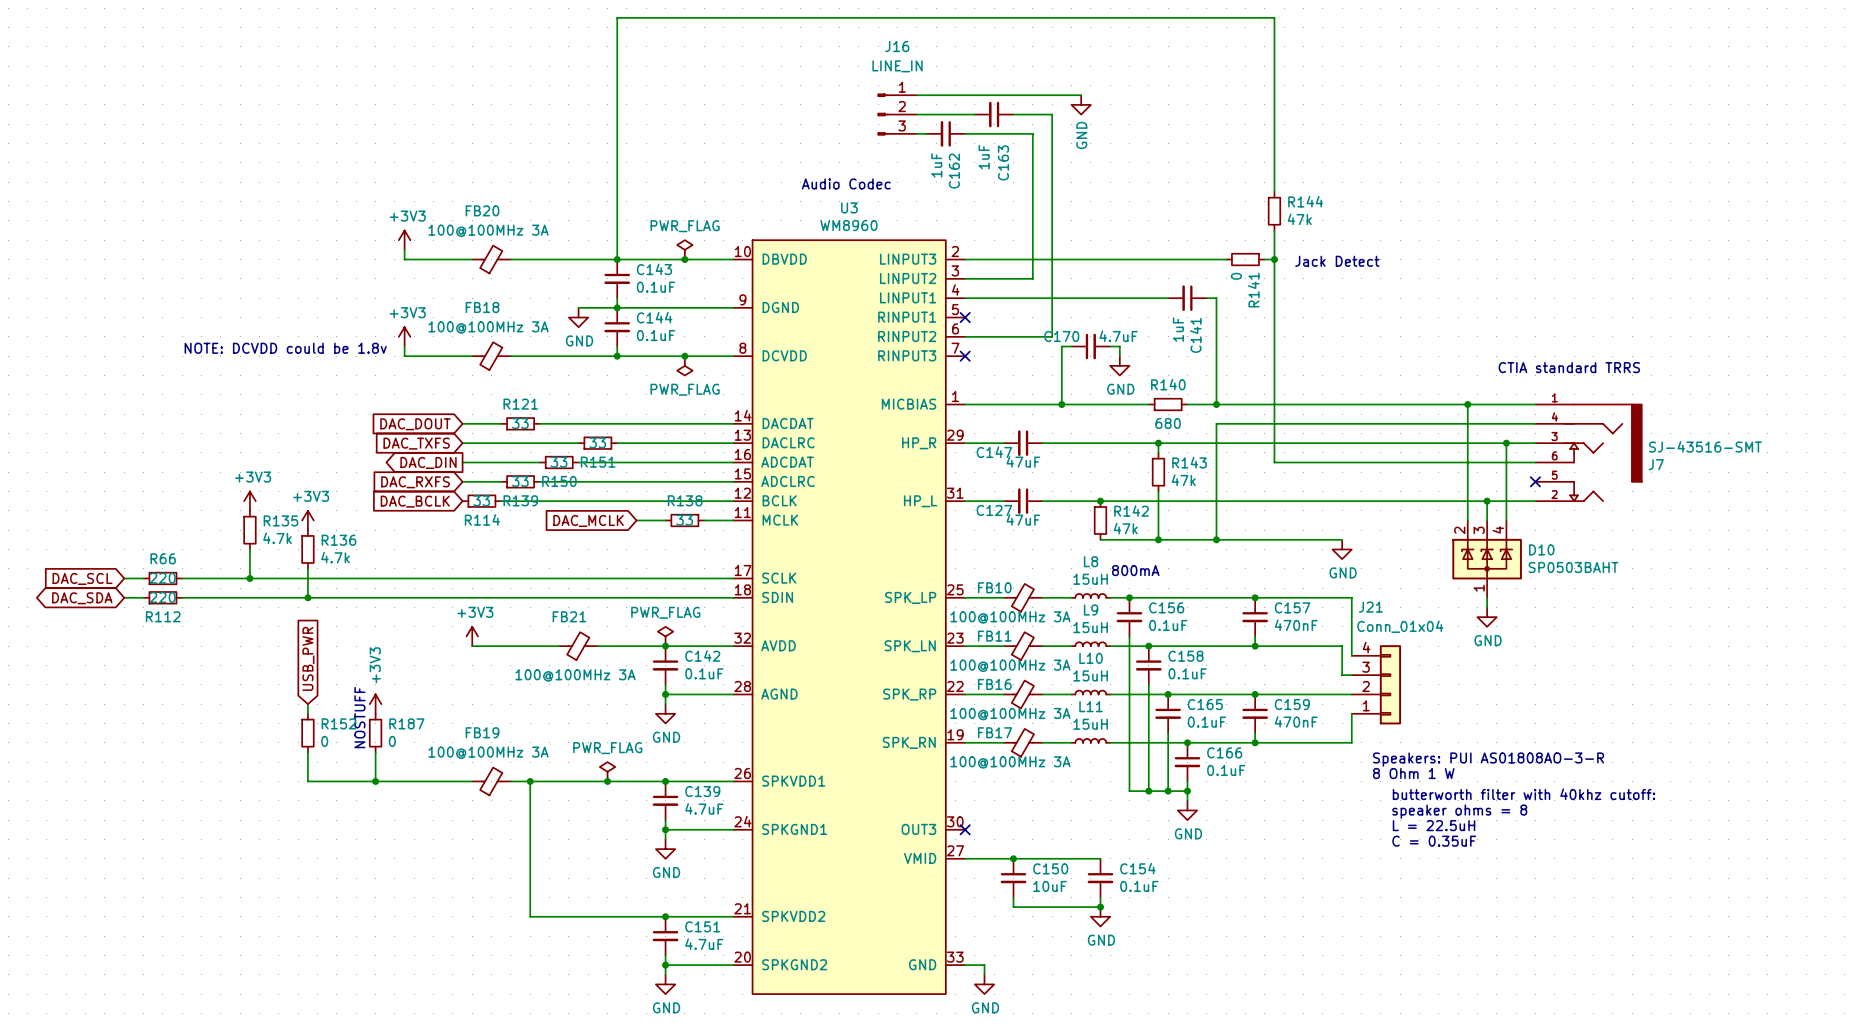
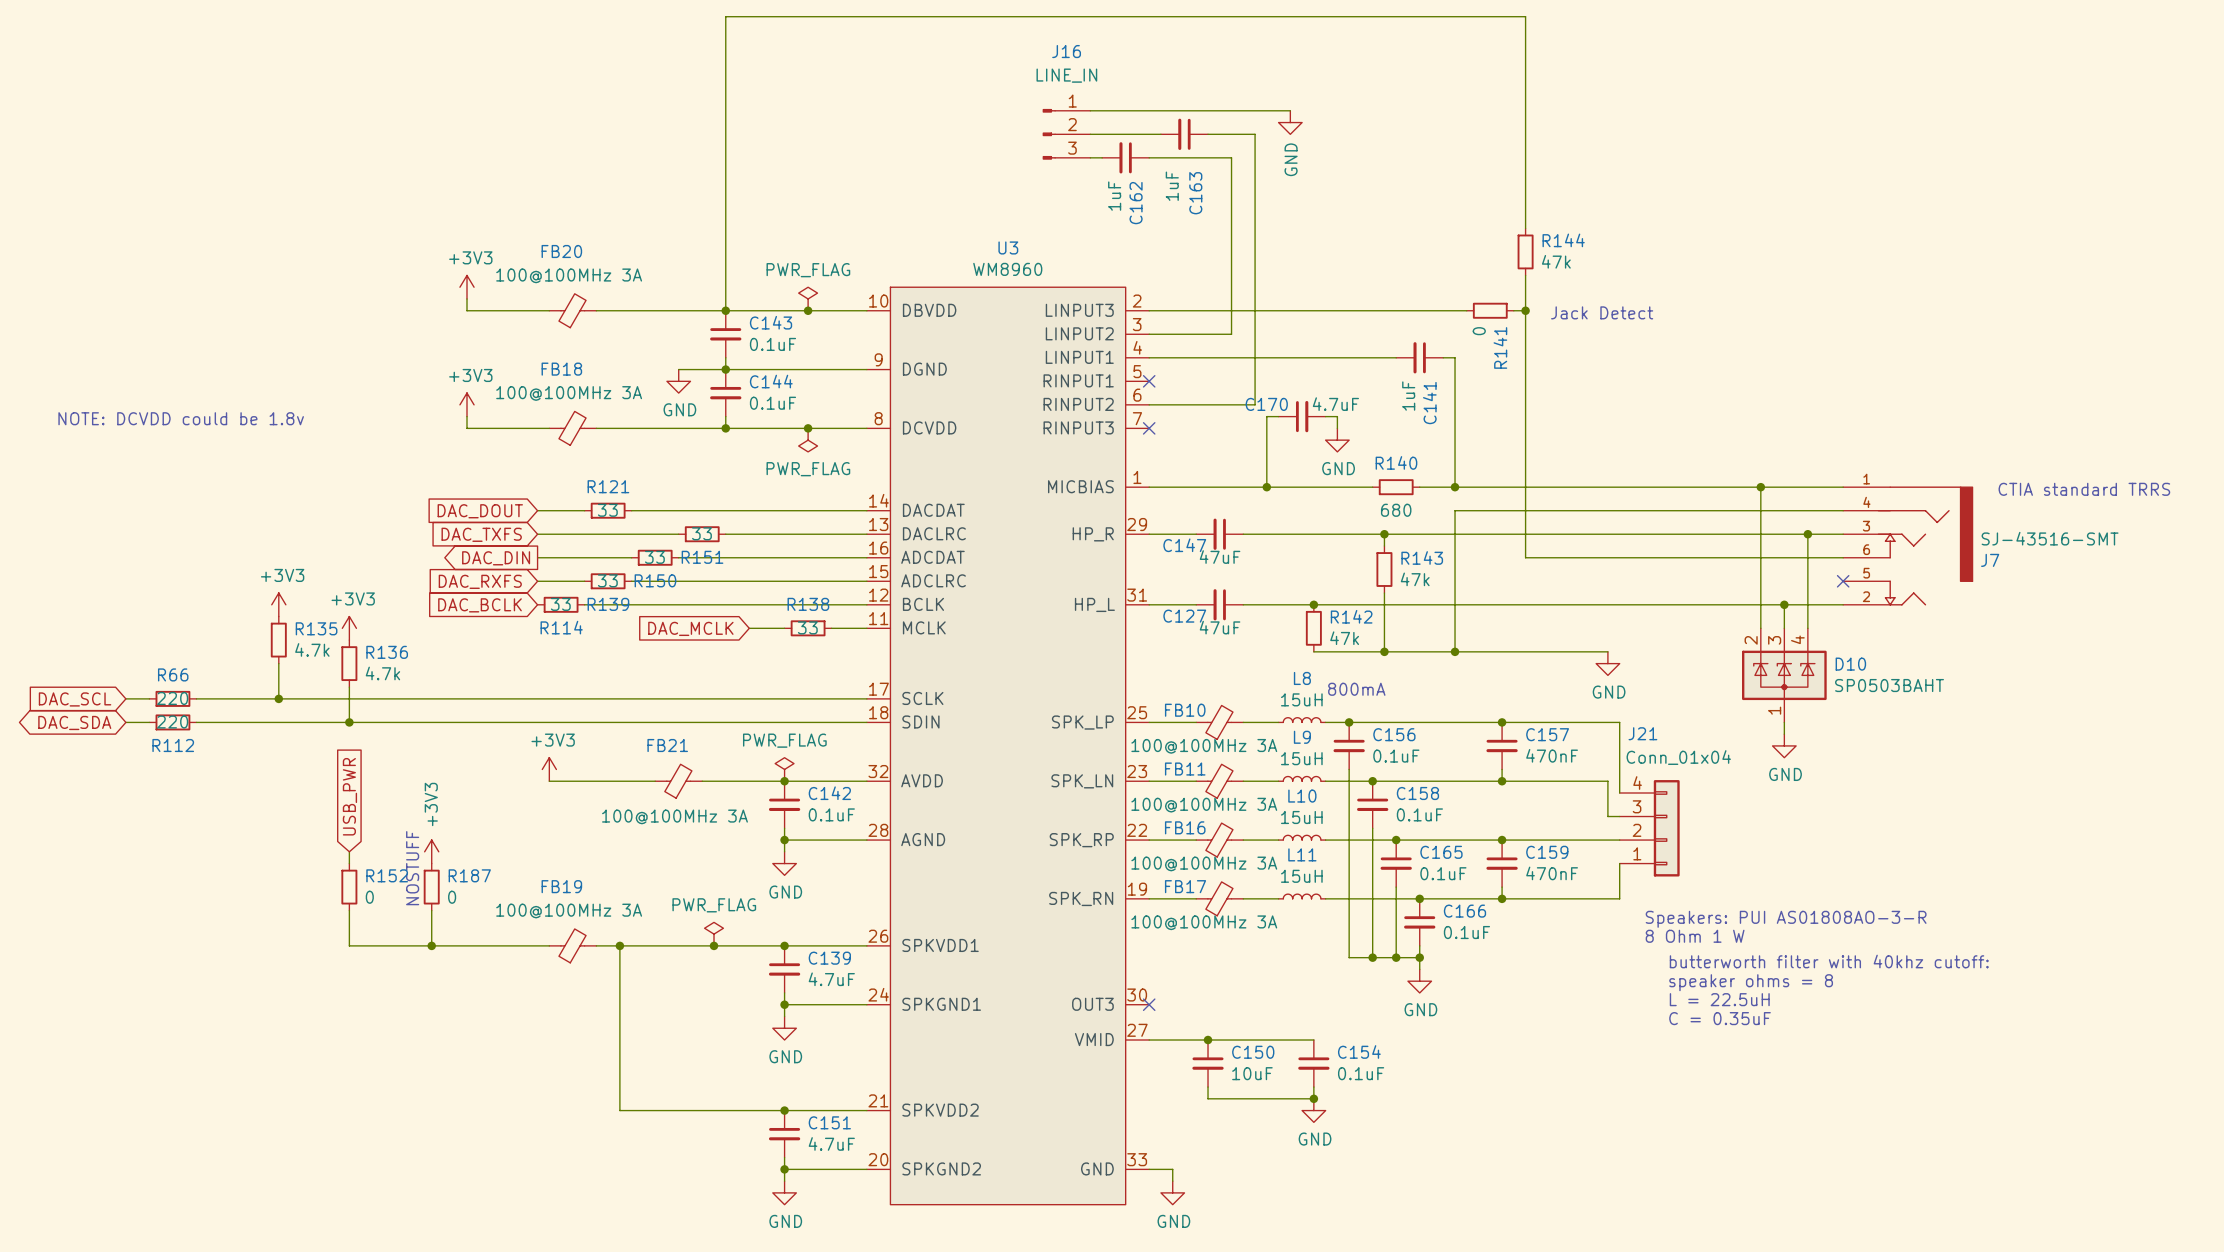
text: Audio Codec (846, 183) -> none
text position: NOTE: DCVDD could be 1.8v (285, 348) -> NOTE: DCVDD could be 1.8v (181, 418)
text position: CTIA standard TRRS (1569, 367) -> CTIA standard TRRS (2084, 489)

